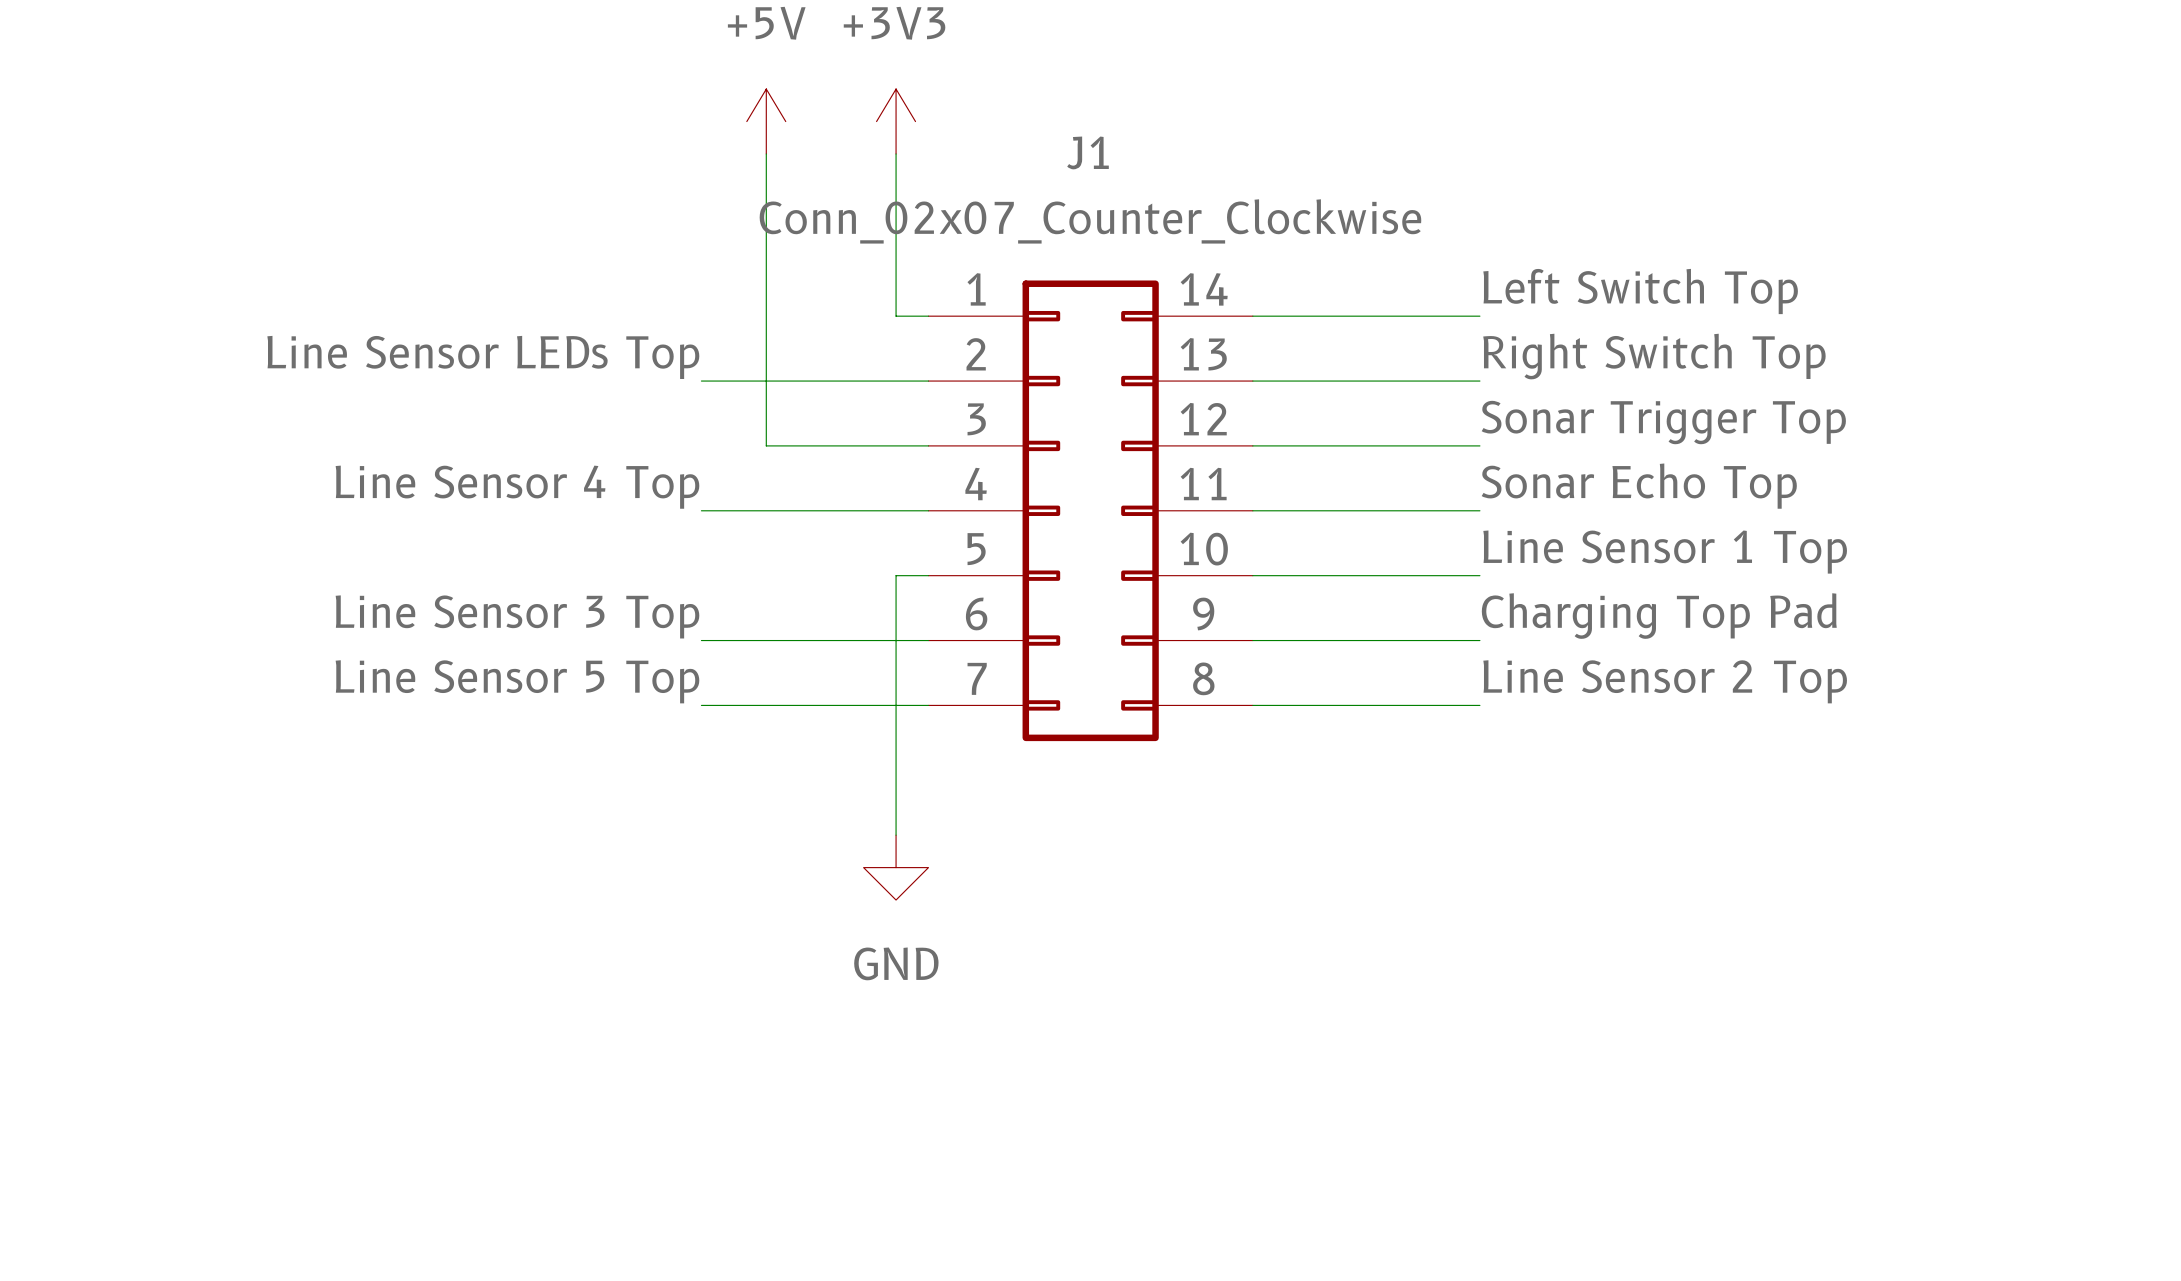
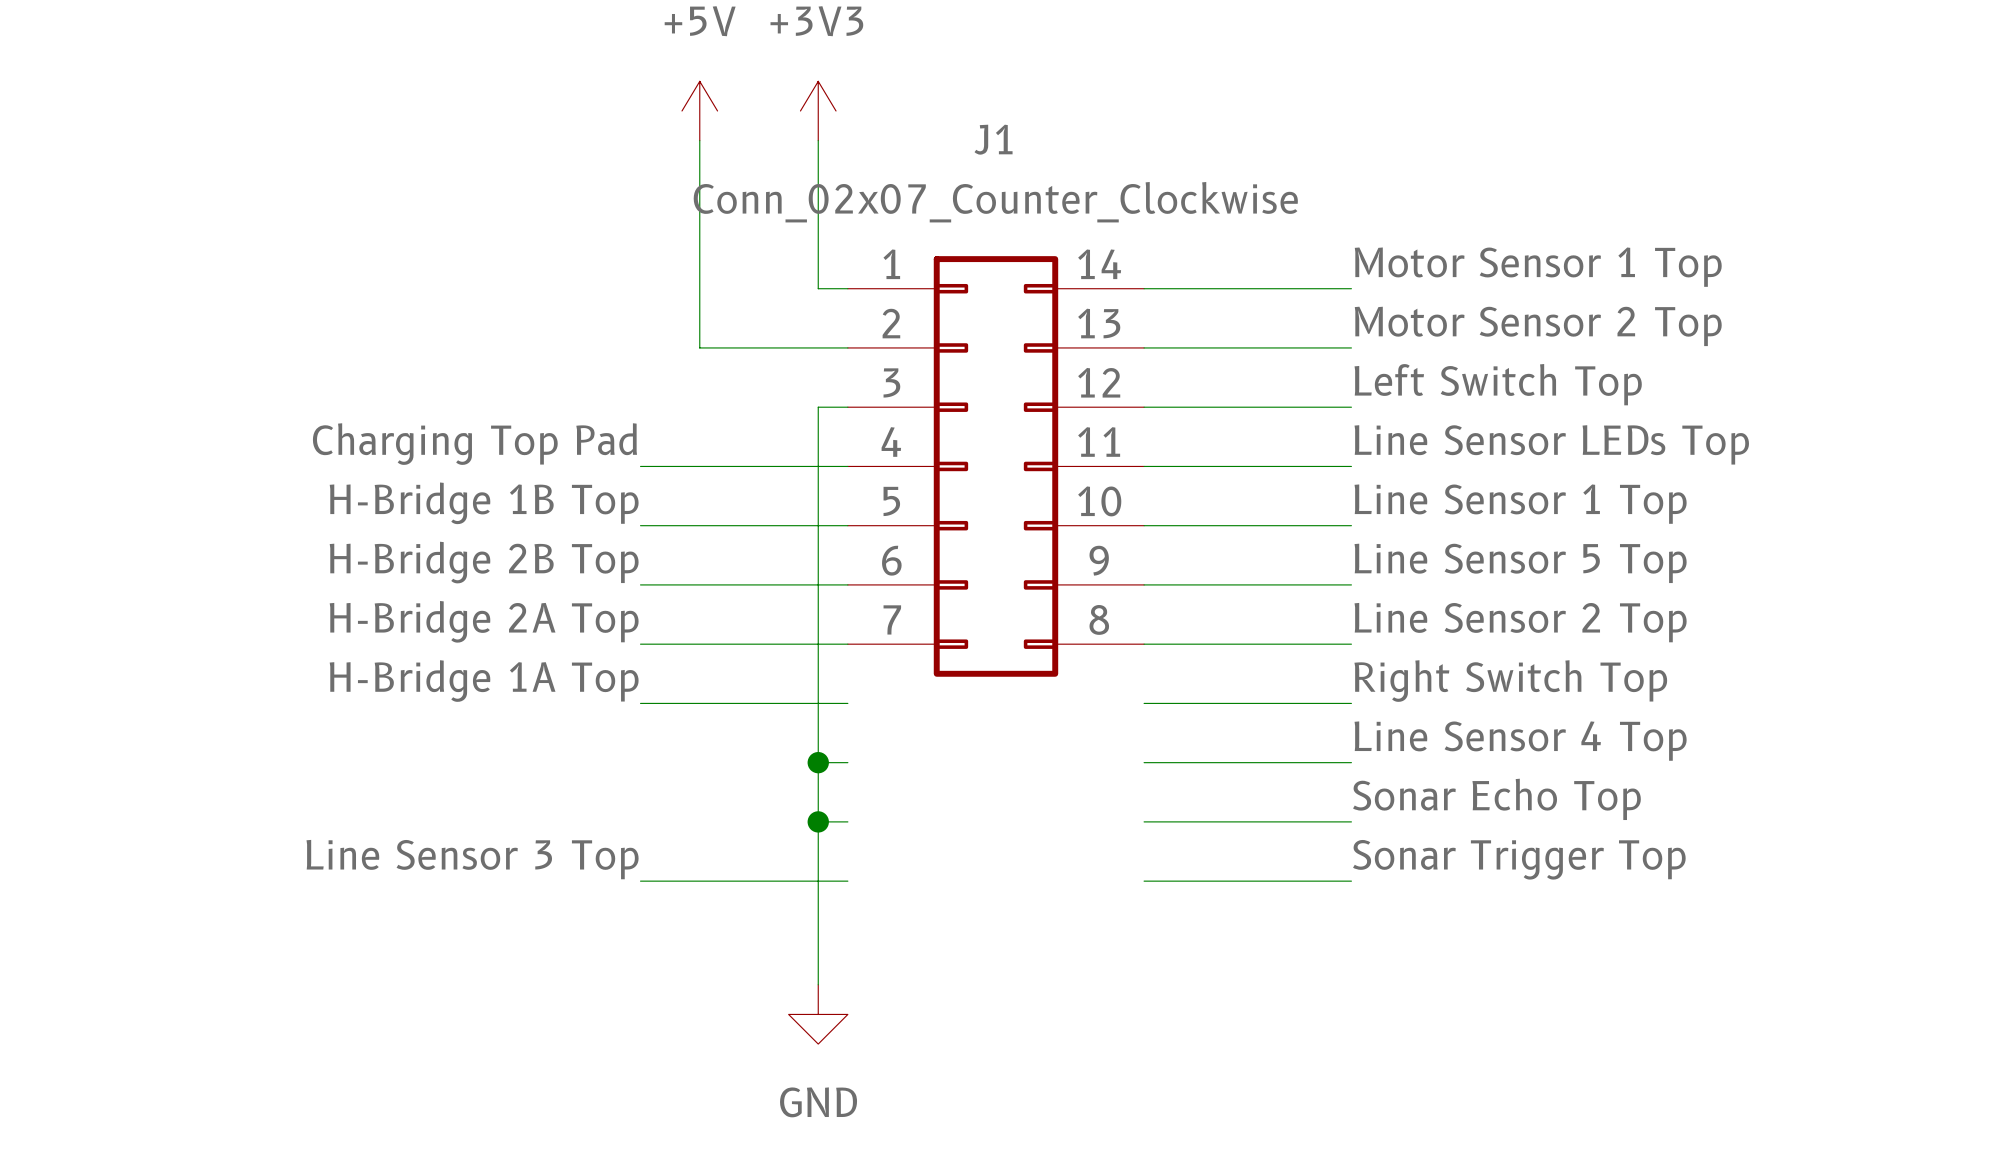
label: Left Switch Top (1640, 291) -> Motor Sensor 1 Top (1538, 267)
label: Right Switch Top (1654, 356) -> Motor Sensor 2 Top (1538, 326)
label: Line Sensor LEDs Top (483, 357) -> none
wire: (701, 381) (766, 381) (766, 445) (896, 445) -> (640, 525) (818, 525) (818, 407)
label: Sonar Trigger Top (1663, 422) -> Left Switch Top (1498, 384)
label: Sonar Echo Top (1639, 486) -> Line Sensor LEDs Top (1551, 444)
label: Line Sensor 4 Top (517, 487) -> Charging Top Pad (474, 444)
label: none -> H-Bridge 1B Top (484, 503)
label: Line Sensor 3 Top (517, 616) -> H-Bridge 2B Top (484, 562)
label: Charging Top Pad (1659, 616) -> Line Sensor 5 Top (1520, 563)
label: Line Sensor 5 Top (517, 681) -> H-Bridge 2A Top (484, 621)
label: none -> H-Bridge 1A Top (484, 681)
label: none -> Right Switch Top (1510, 681)
wire: none -> (640, 703) (847, 703)
wire: none -> (1144, 703) (1351, 703)
label: none -> Line Sensor 4 Top (1520, 741)
junction: none -> (818, 762)
wire: none -> (847, 762) (818, 762) (818, 984)
wire: none -> (1144, 762) (1351, 762)
power symbol position: GND (896, 867) -> GND (818, 1014)
label: none -> Sonar Echo Top (1496, 799)
wire: none -> (818, 821) (847, 821)
junction: none -> (818, 821)
wire: none -> (1144, 821) (1351, 821)
label: none -> Line Sensor 3 Top (472, 859)
label: none -> Sonar Trigger Top (1519, 859)
wire: none -> (640, 881) (847, 881)
wire: none -> (1144, 881) (1351, 881)

